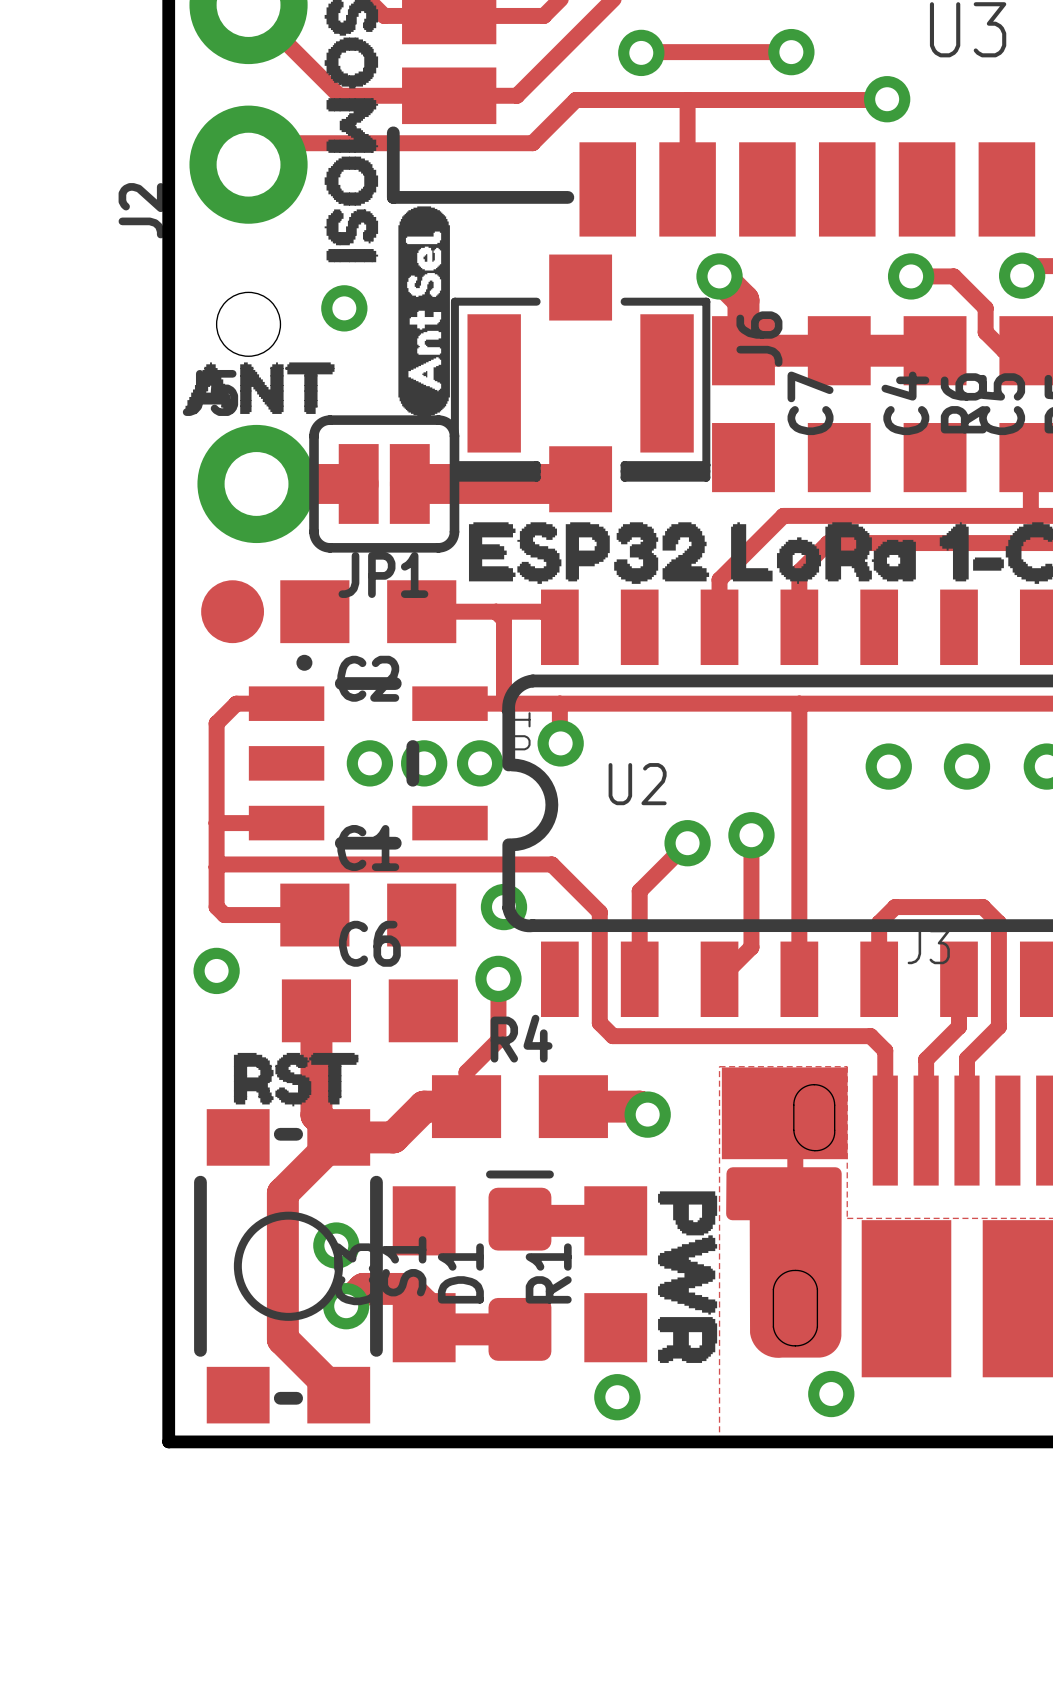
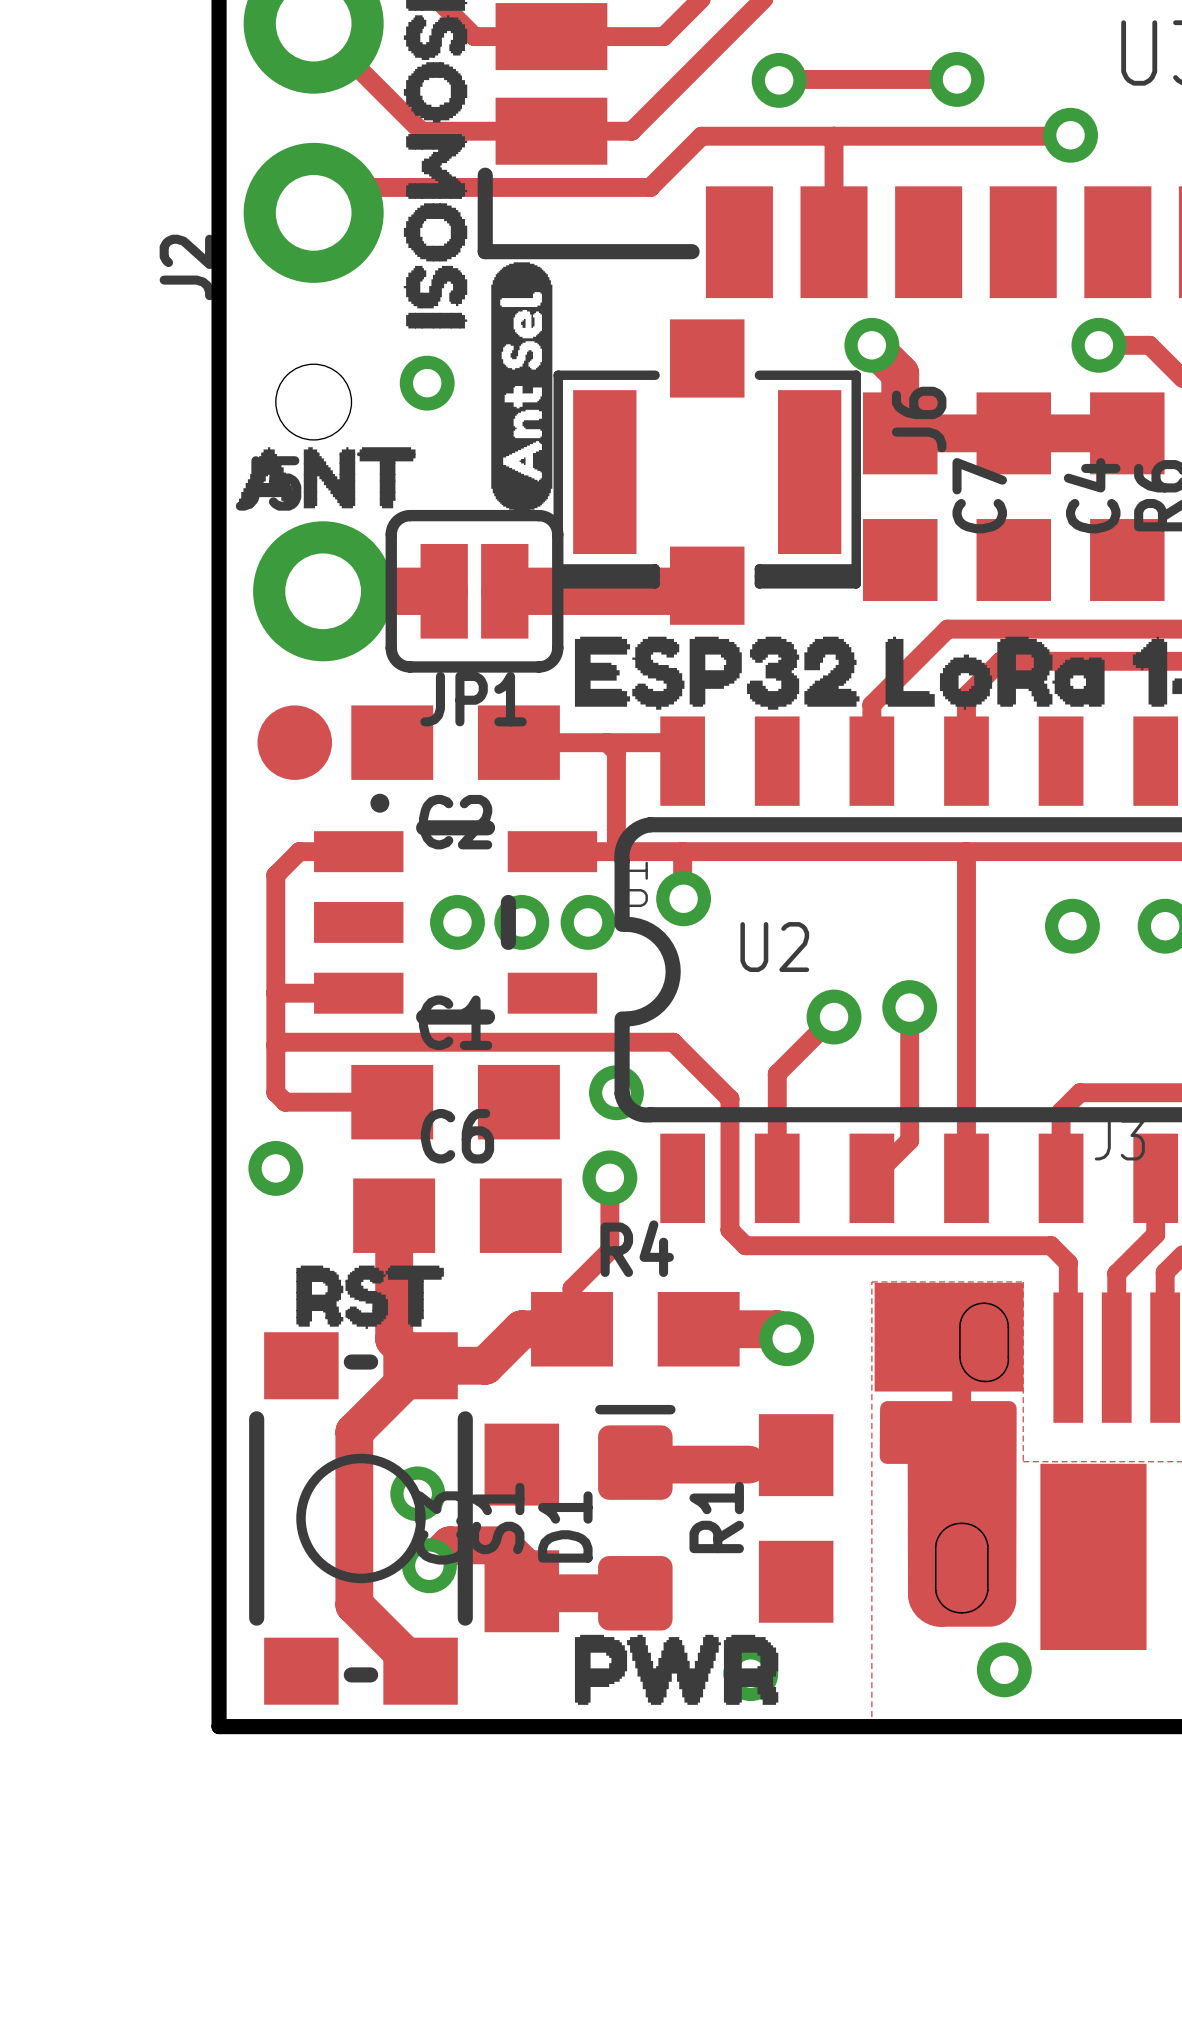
drawing: [658, 1191, 718, 1363] -> none
R1 position: (615, 1274) -> (796, 1518)
drawing: none -> [574, 1634, 779, 1705]

